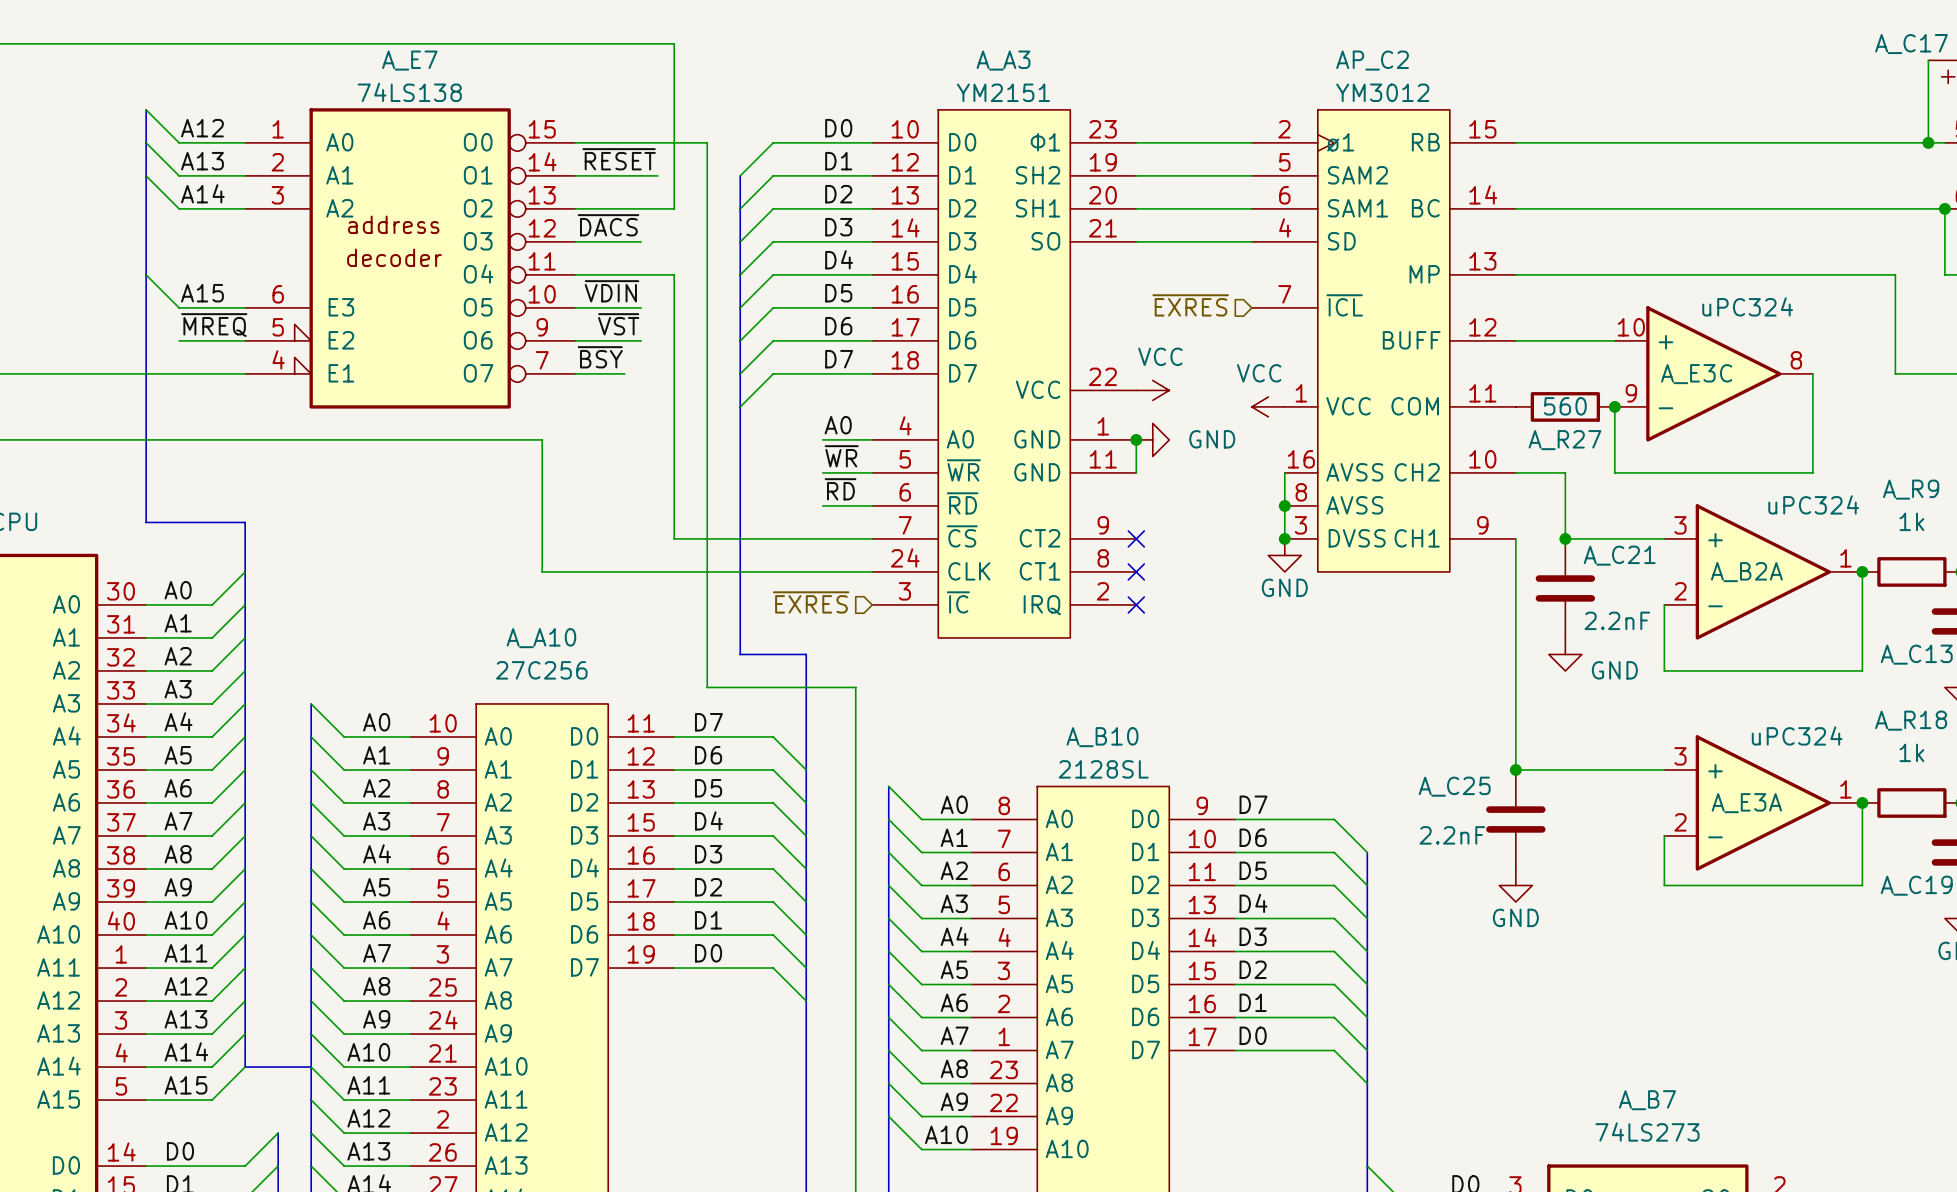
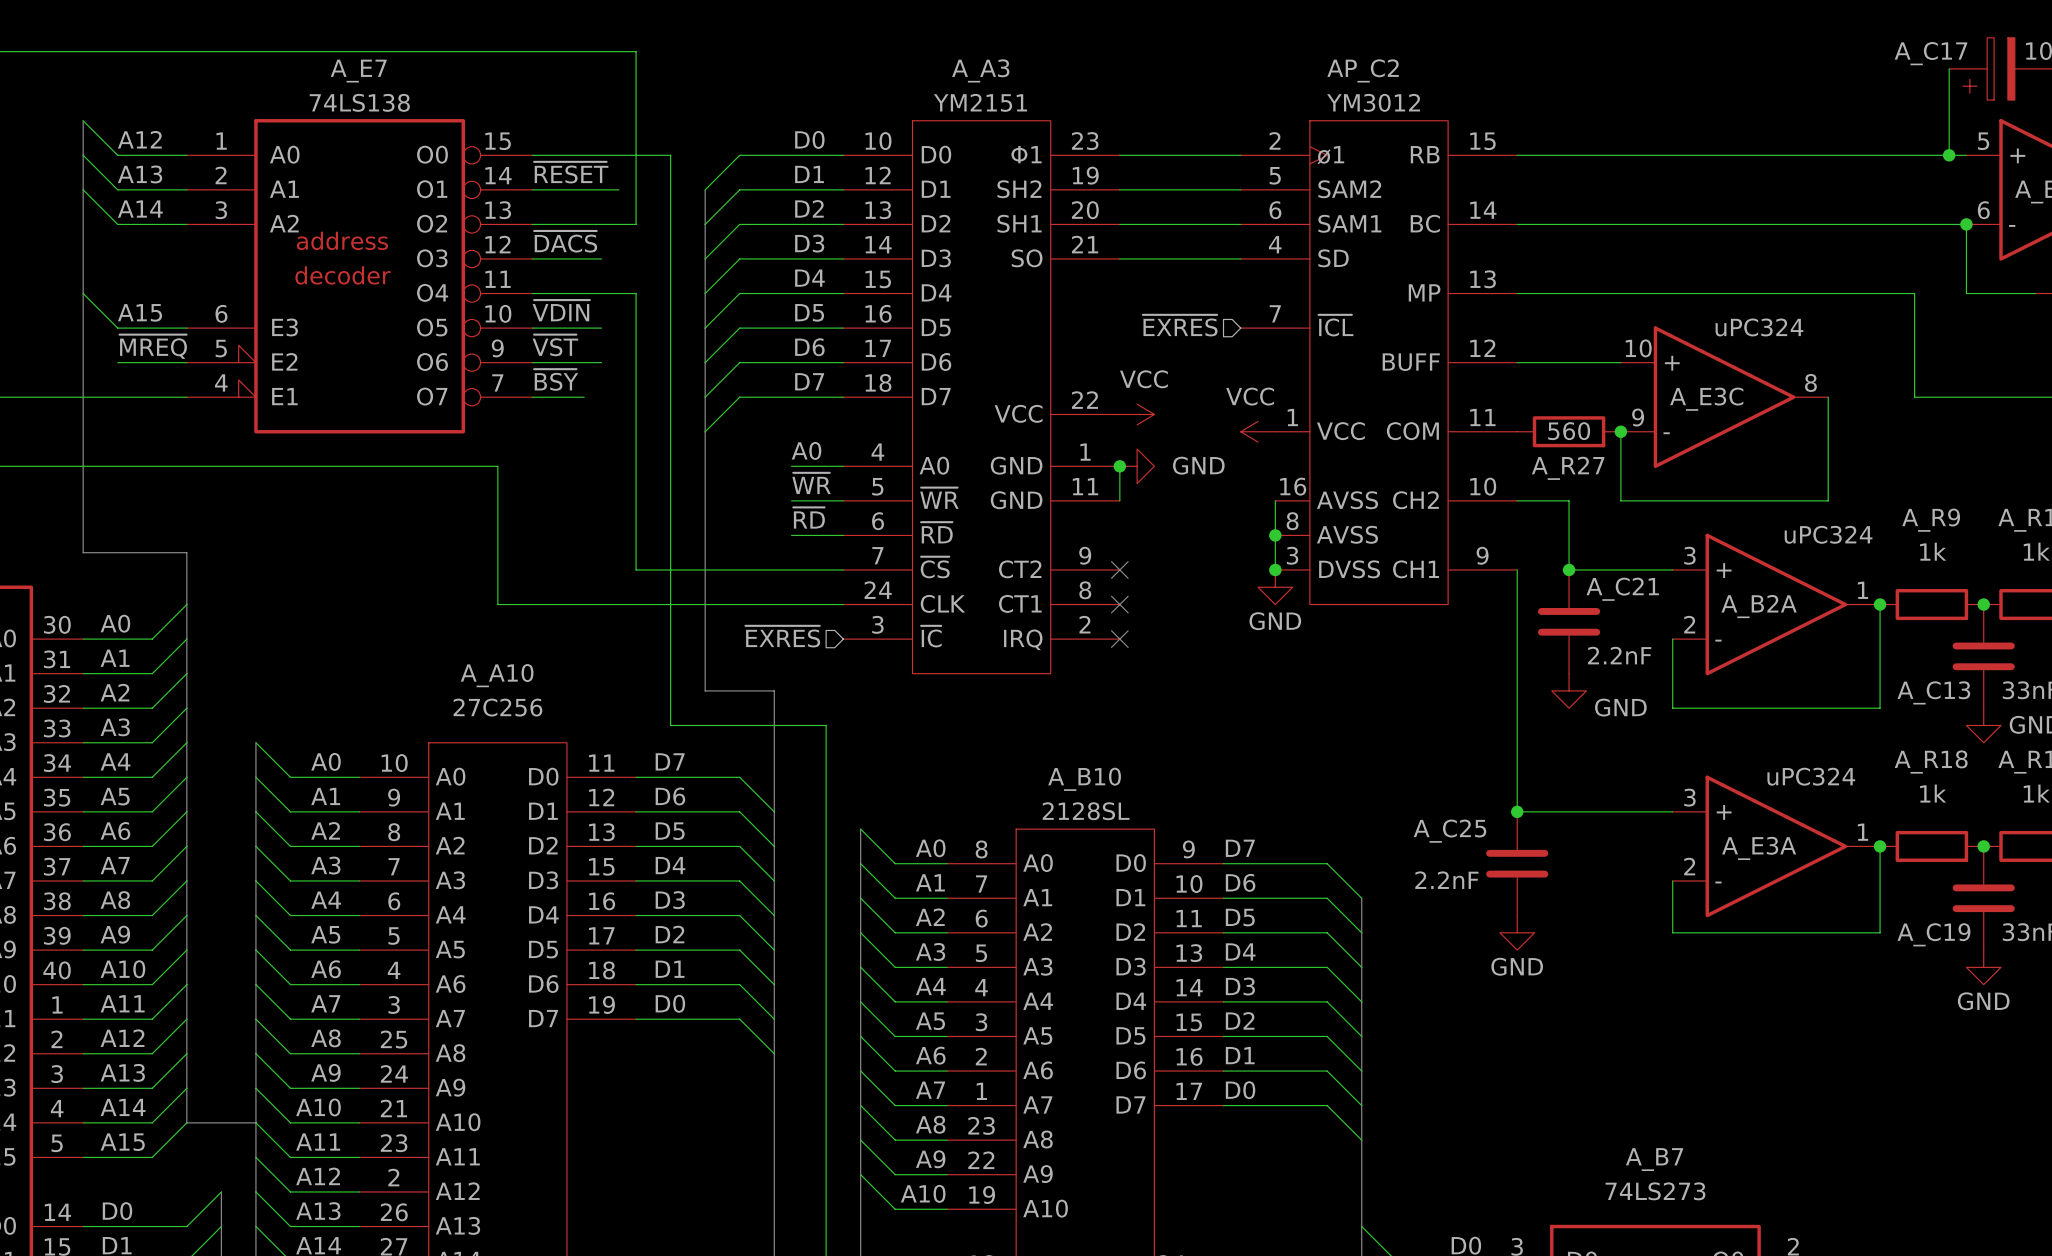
label position: ~{RESET} (619, 159) -> ~{RESET} (571, 172)
label position: ~{DACS} (608, 225) -> ~{DACS} (565, 241)
label position: ~{VDIN} (611, 291) -> ~{VDIN} (561, 310)
label position: ~{VST} (618, 324) -> ~{VST} (555, 345)
label position: ~{BSY} (600, 357) -> ~{BSY} (556, 379)

